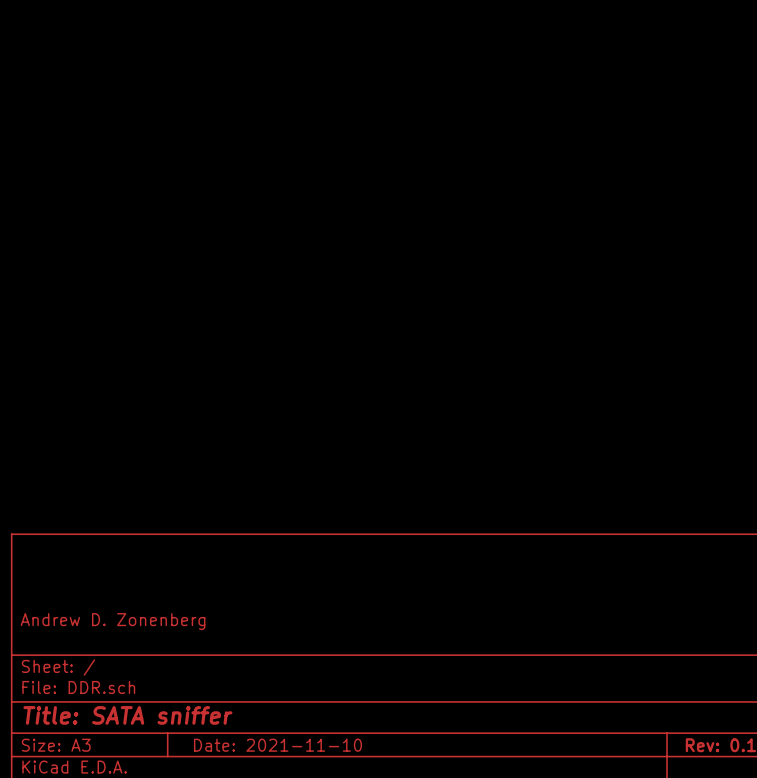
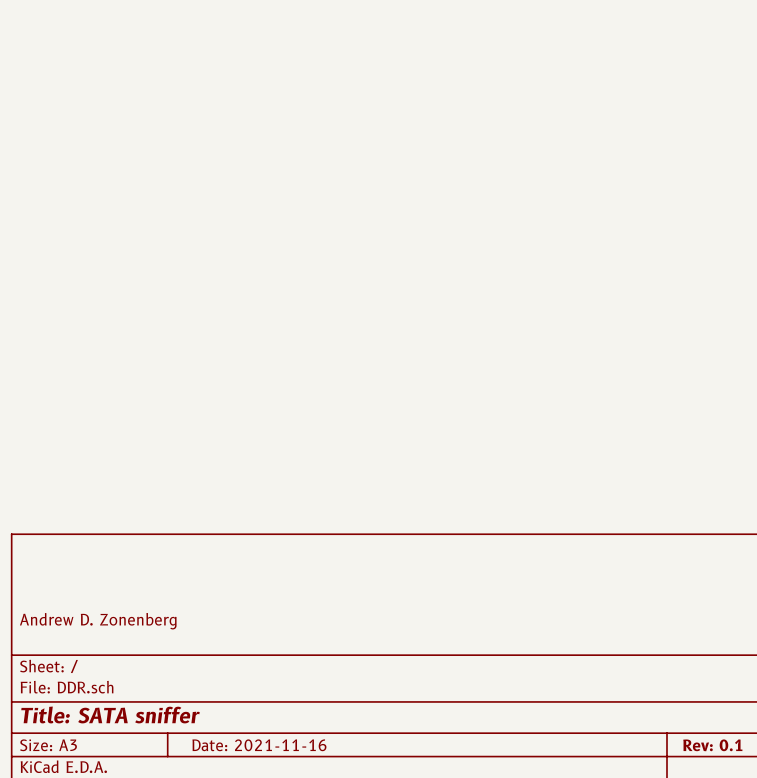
title block: Date: 2021-11-10 (277, 745) -> Date: 2021-11-16 (259, 745)

